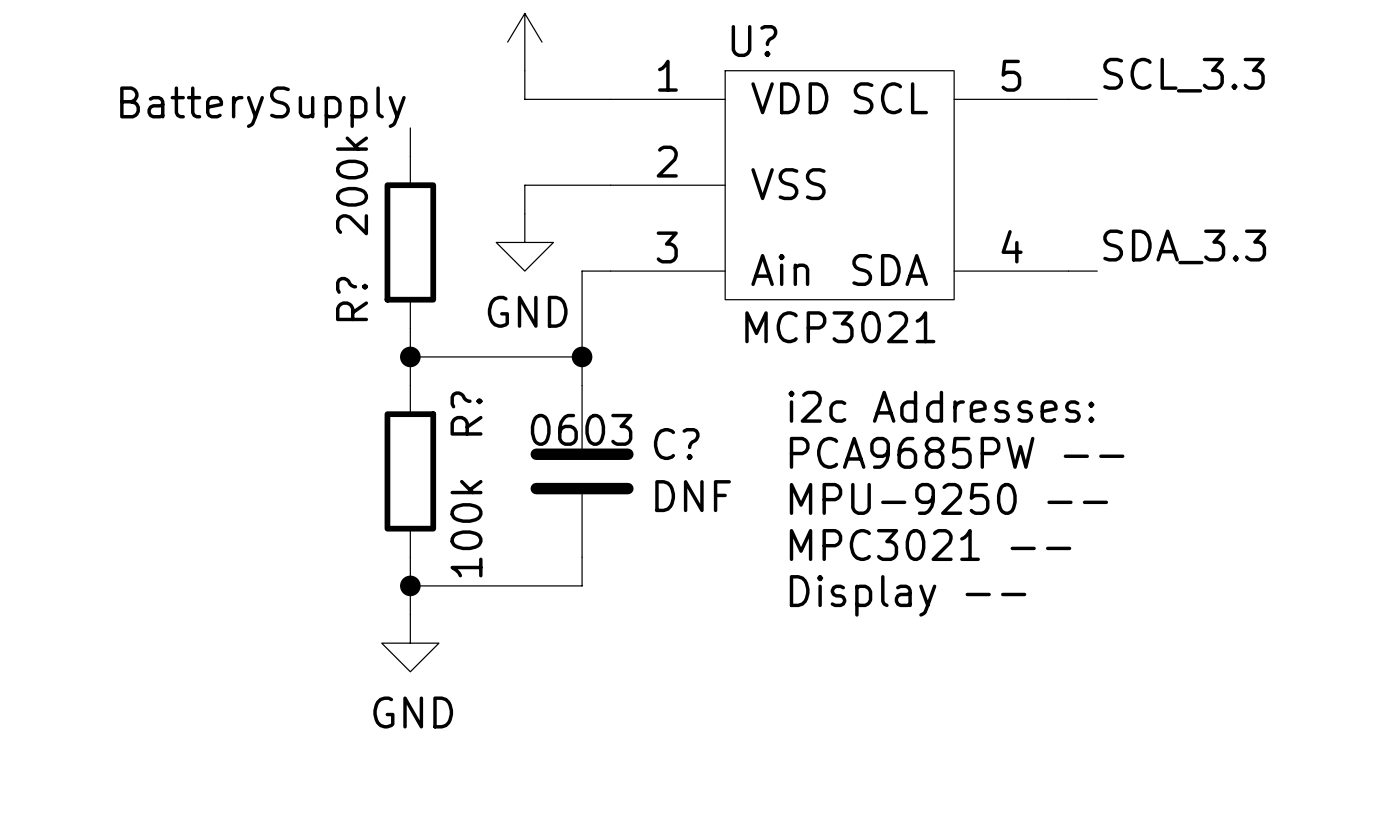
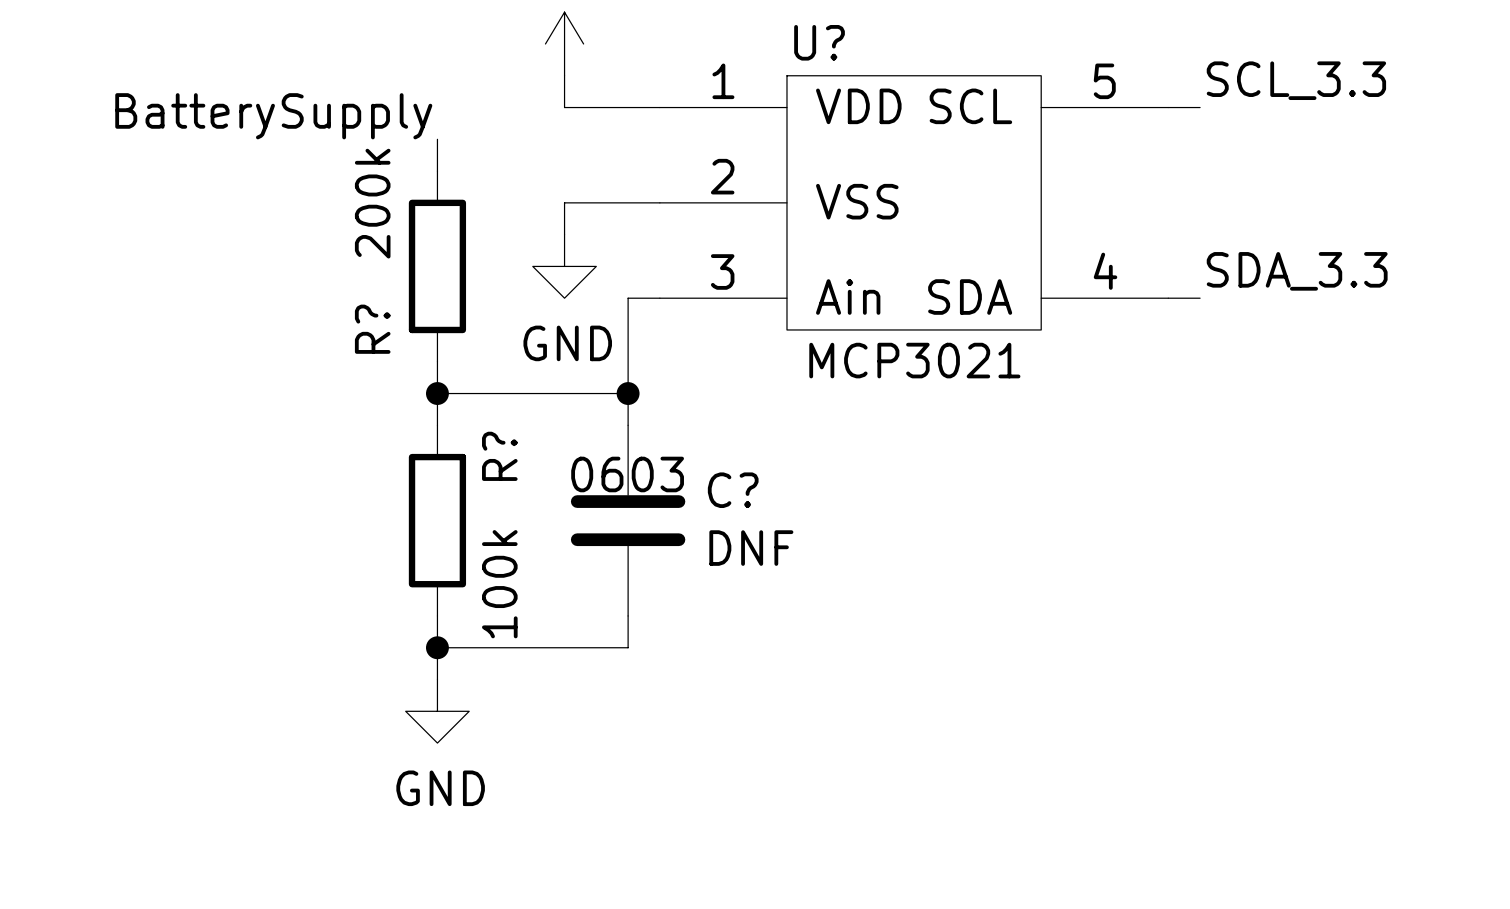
text: i2c Addresses: (941, 406) -> none
text: PCA9685PW -- (957, 452) -> none
text: MPU-9250 -- (948, 498) -> none
text: MPC3021 -- (930, 545) -> none
text: Display -- (908, 595) -> none

